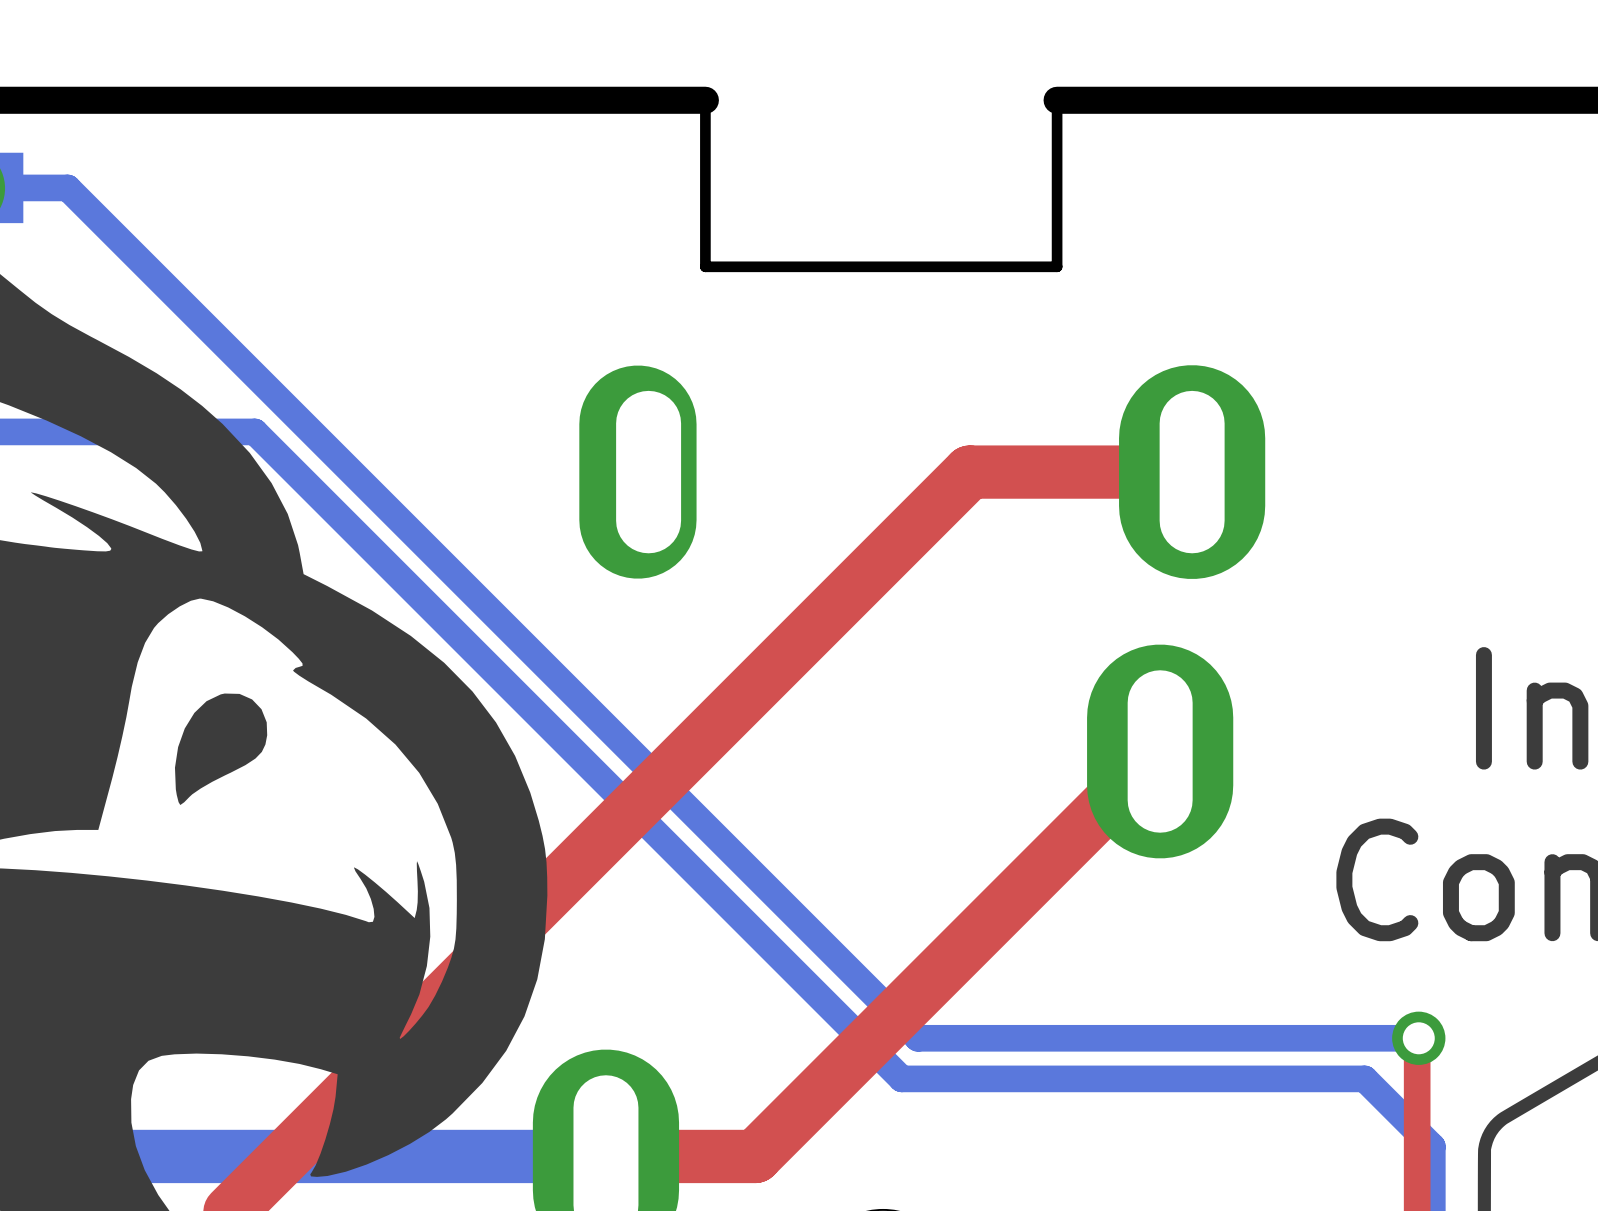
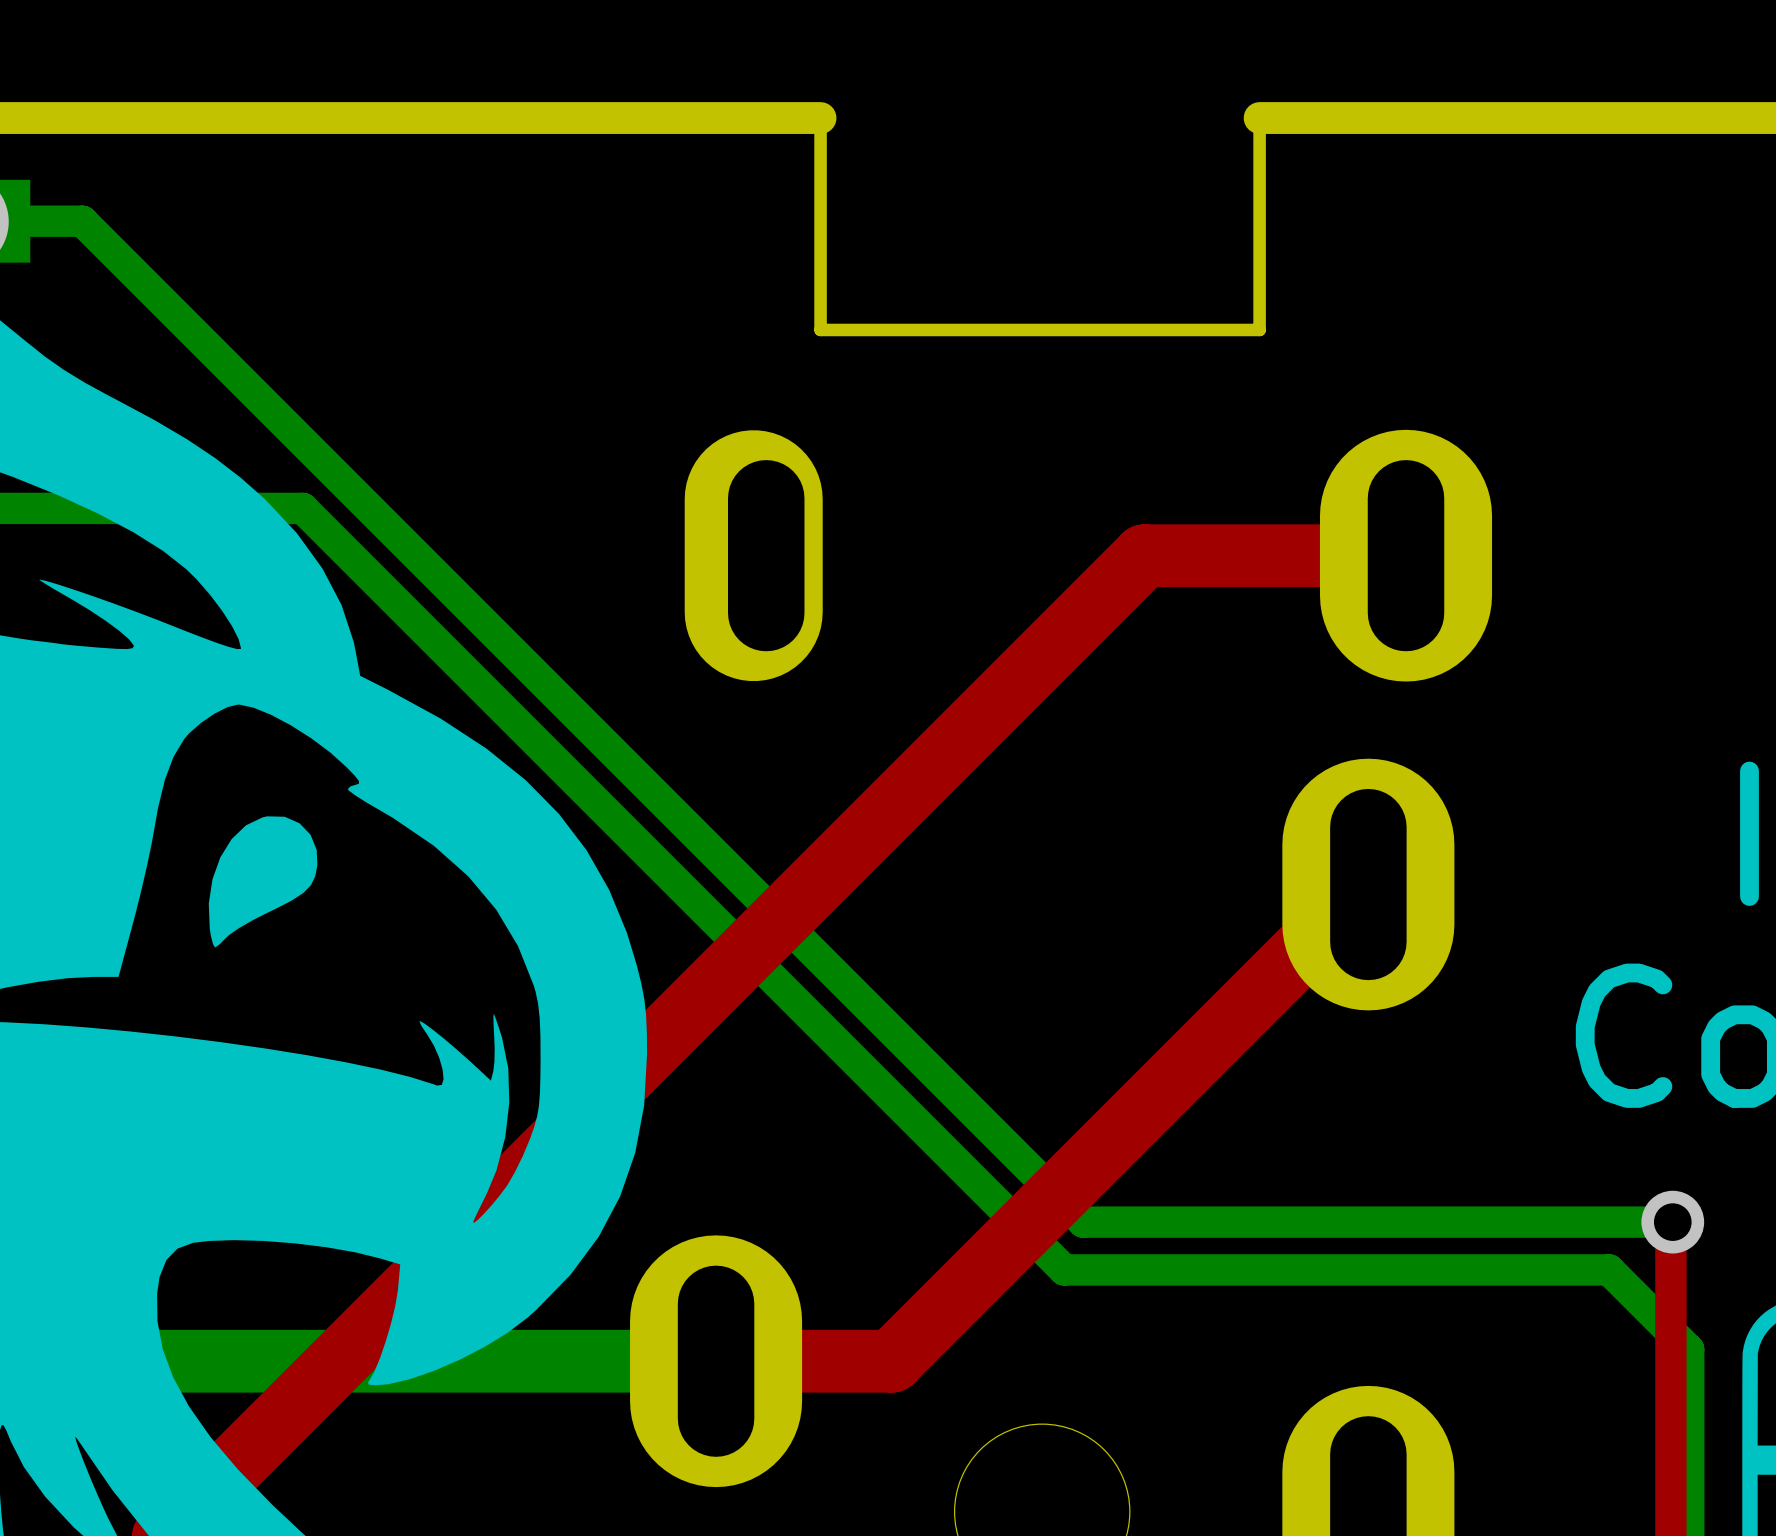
board edge: (694, 100) (705, 100) (705, 266) (1057, 266) (1057, 100) (1067, 100) -> (820, 118) (820, 329) (1259, 329) (1259, 118)

